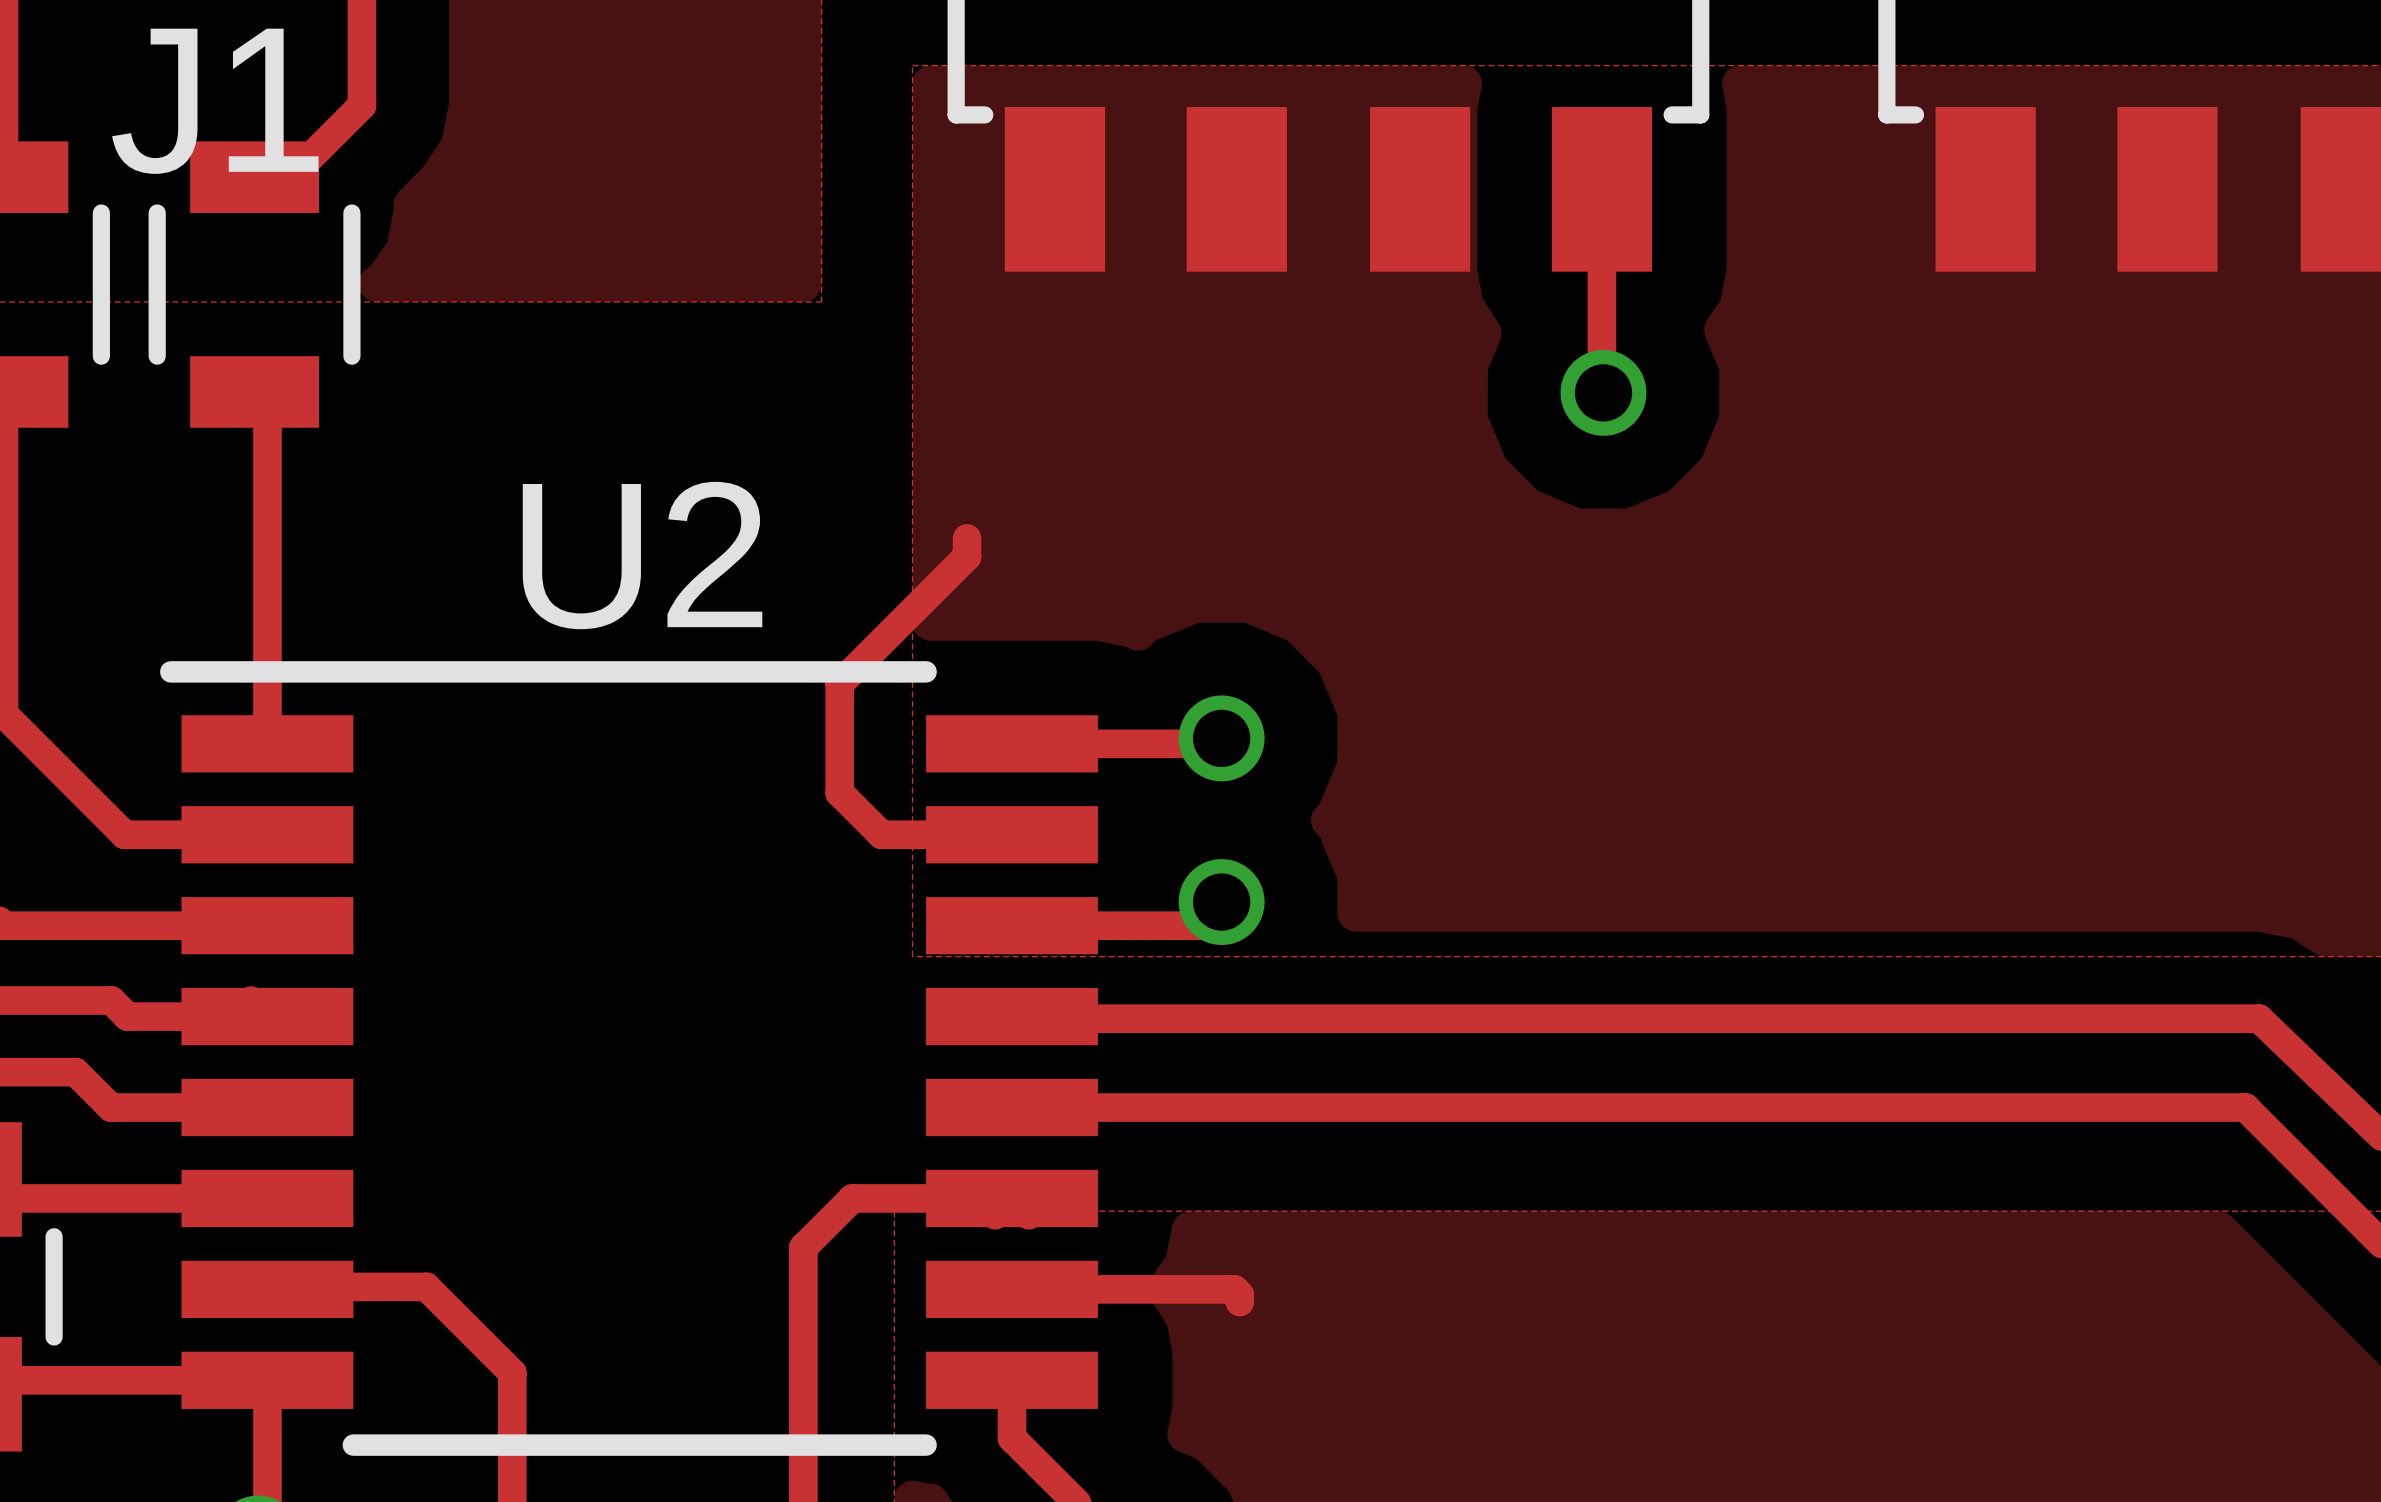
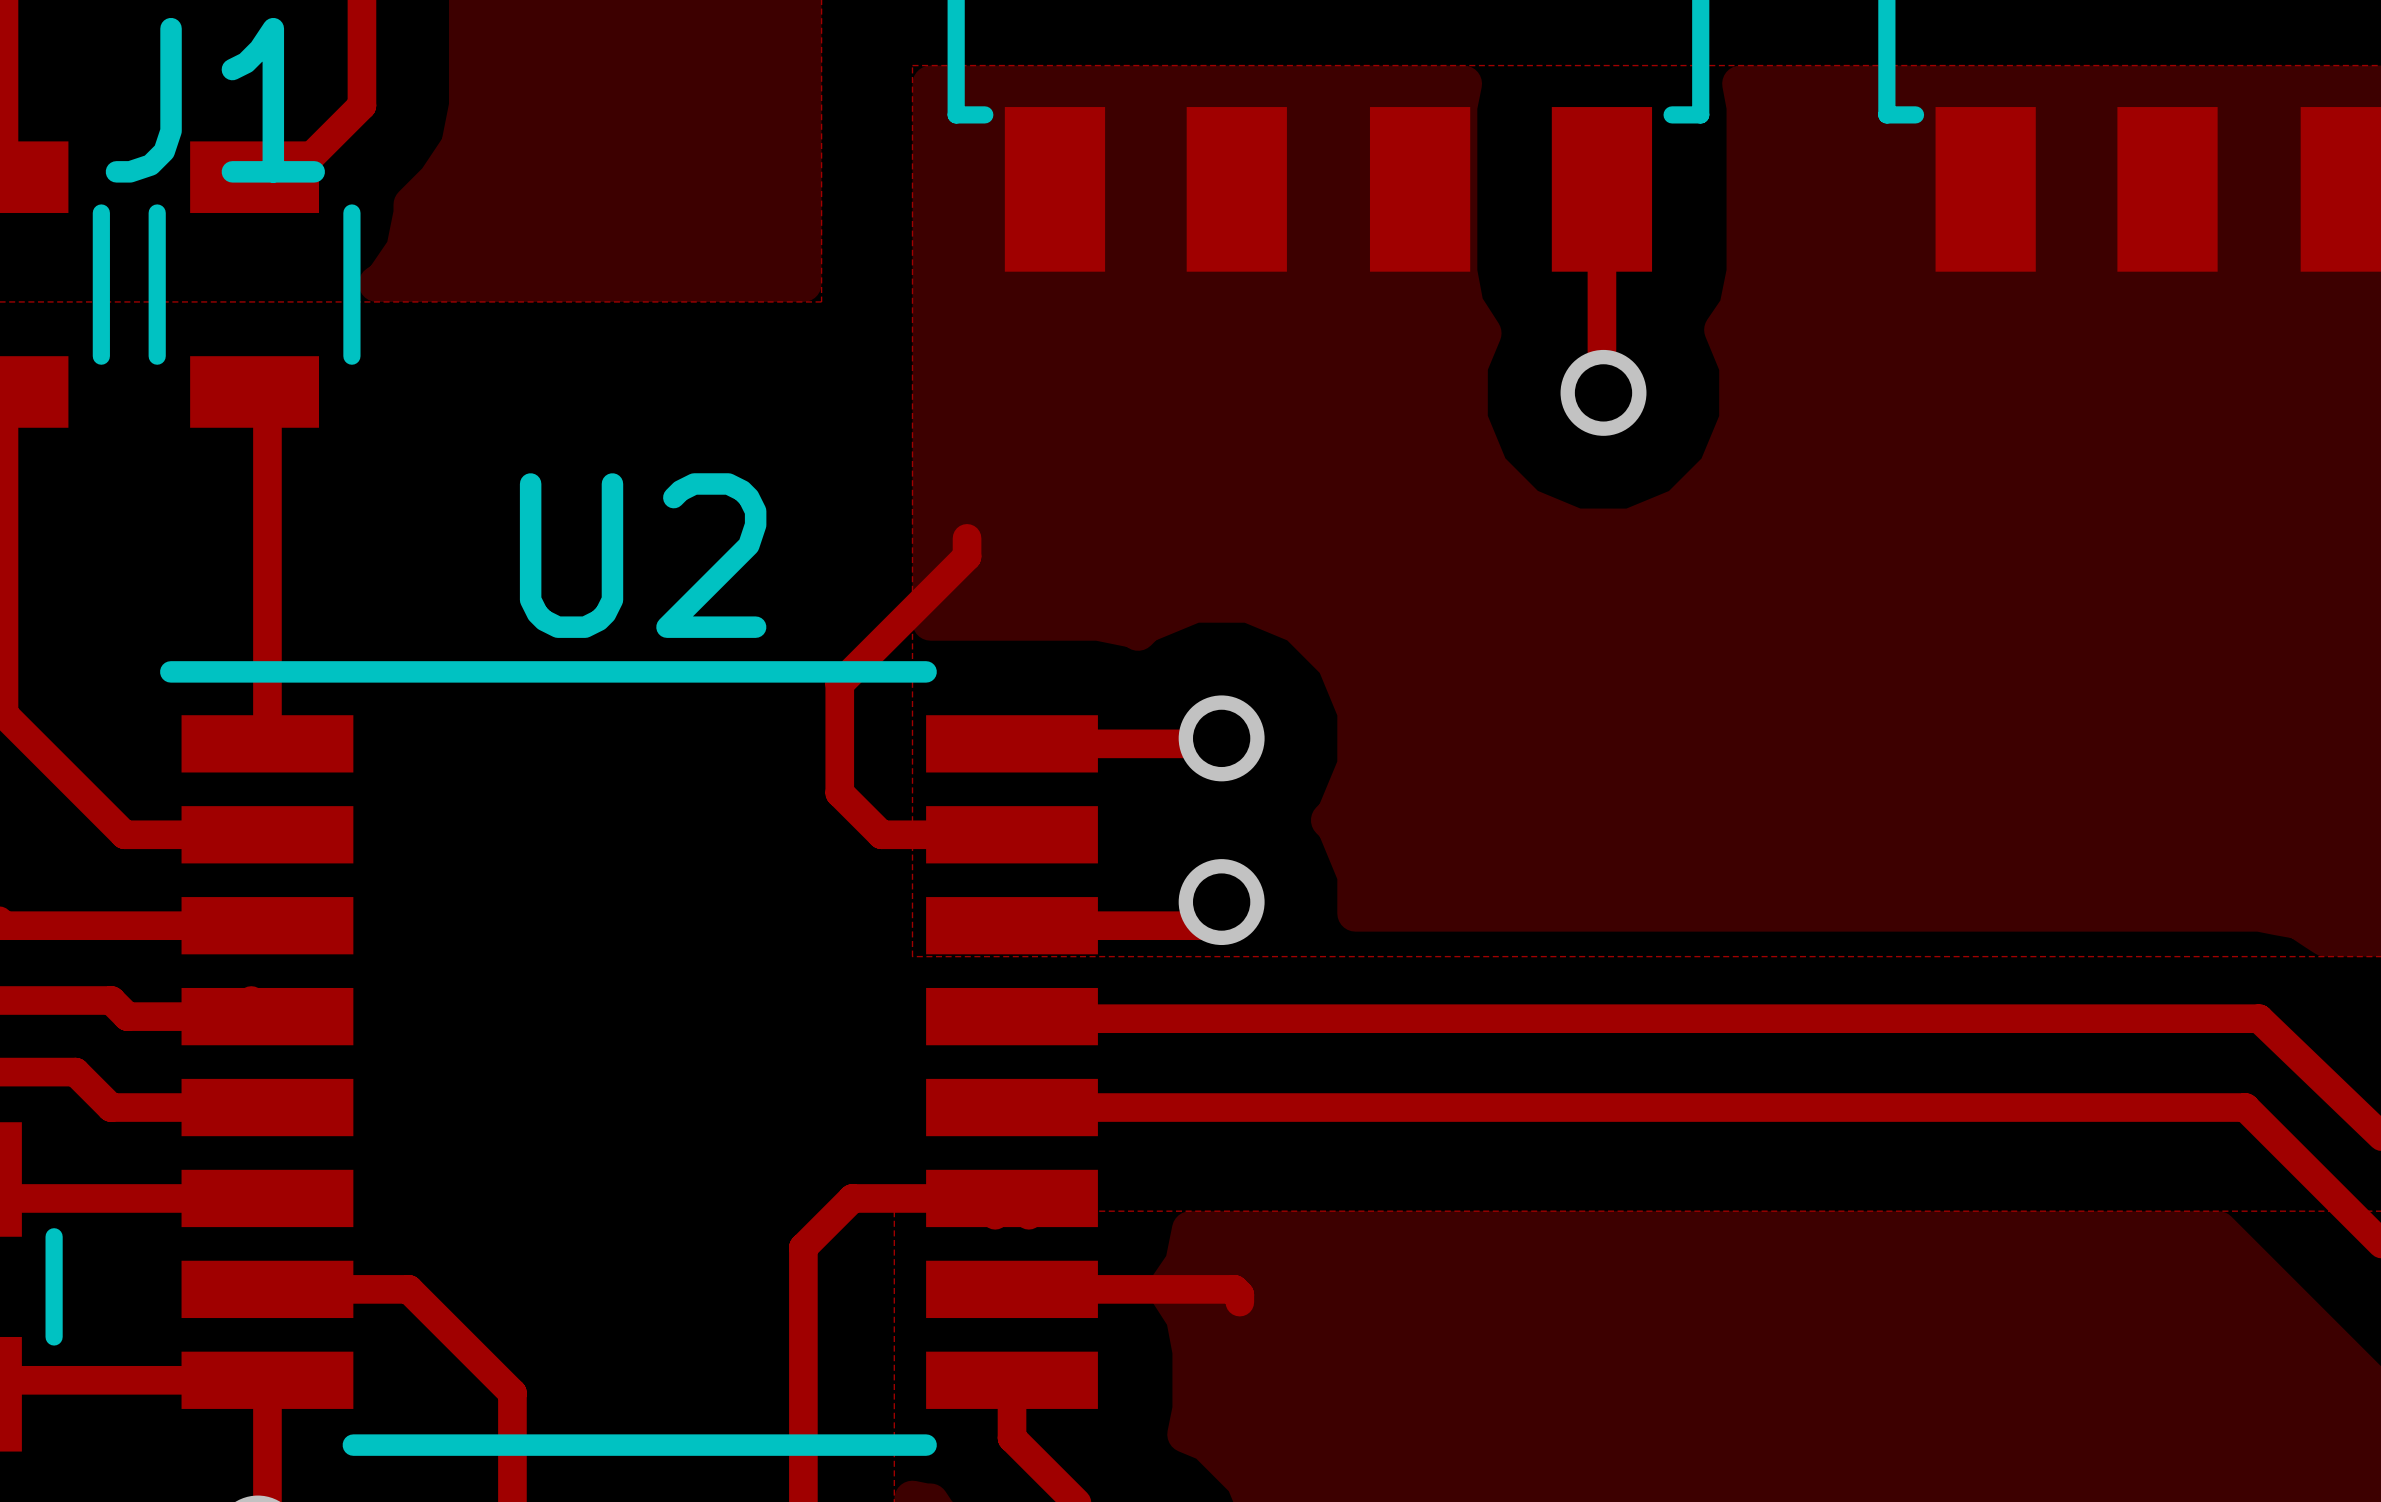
track: (269, 1286) (426, 1286) (512, 1372) (512, 1393) -> (267, 1289) (408, 1289) (512, 1393)

